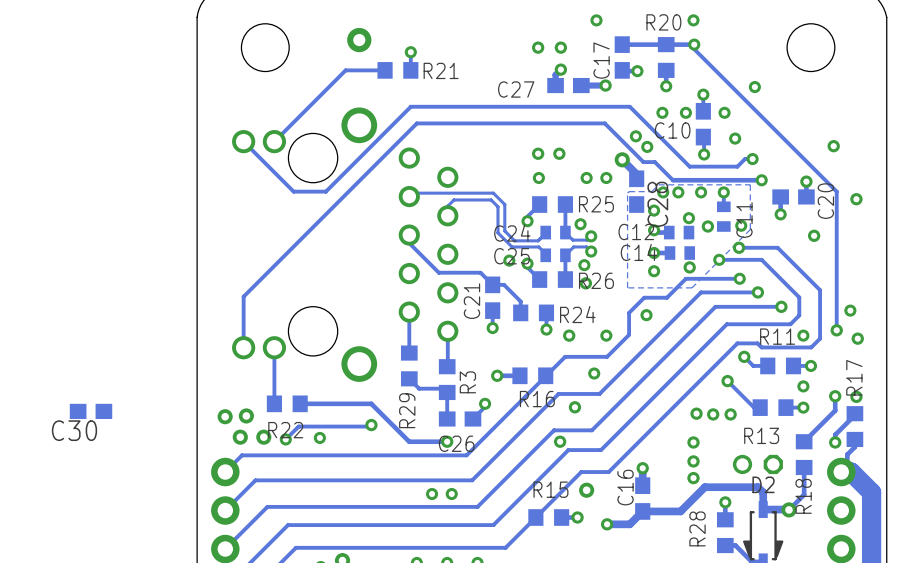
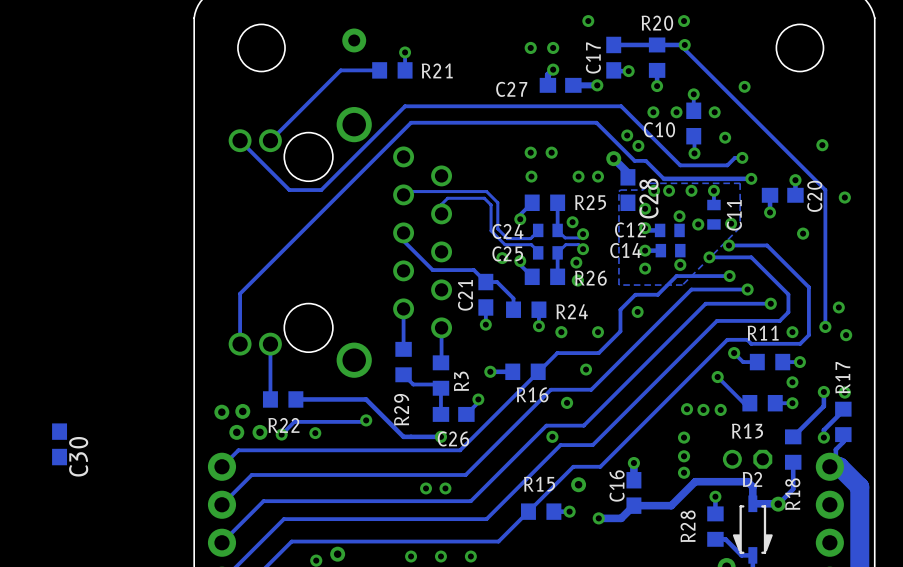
C30 rotation: 0° (91, 411) -> 90° clockwise (59, 444)
C30 position: (91, 411) -> (59, 444)
C30 name position: C30 (74, 430) -> C30 (78, 456)

